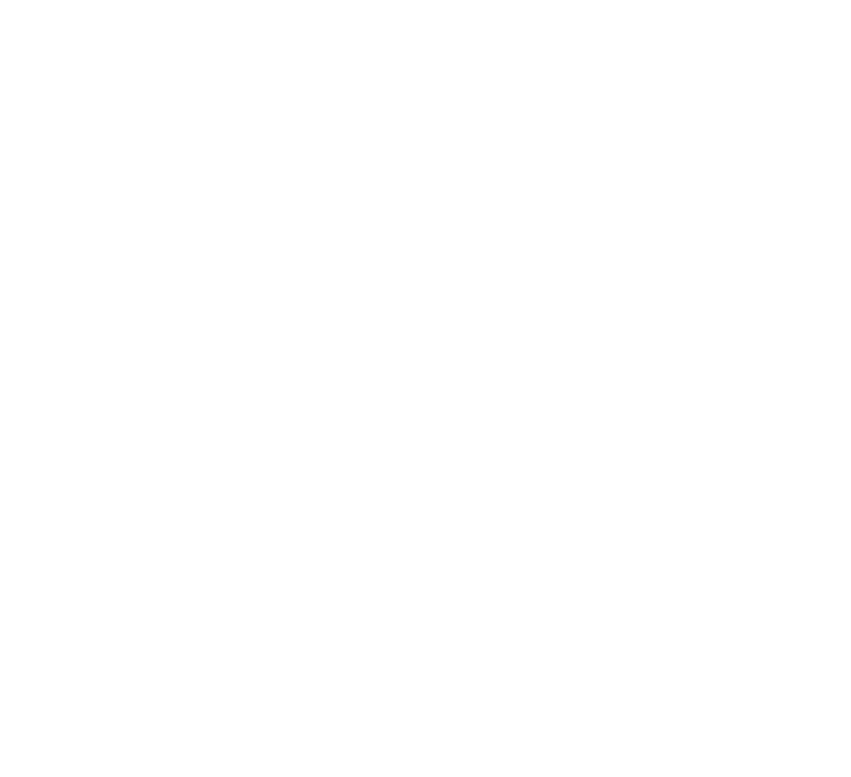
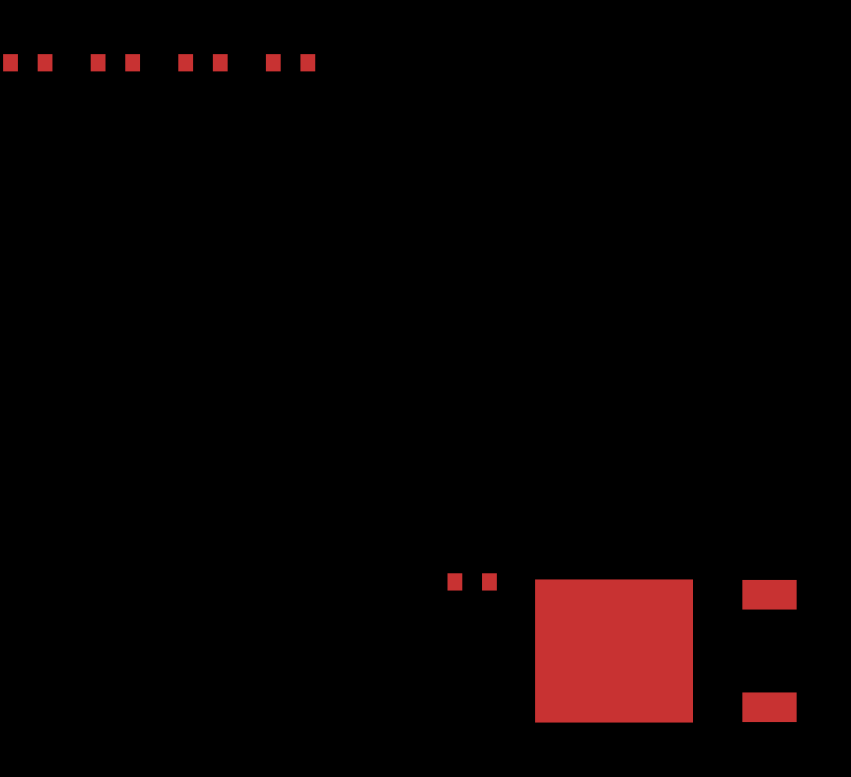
part: none -> (27, 62)
part: none -> (115, 62)
part: none -> (202, 62)
part: none -> (290, 62)
part: none -> (472, 581)
part: none -> (665, 650)

